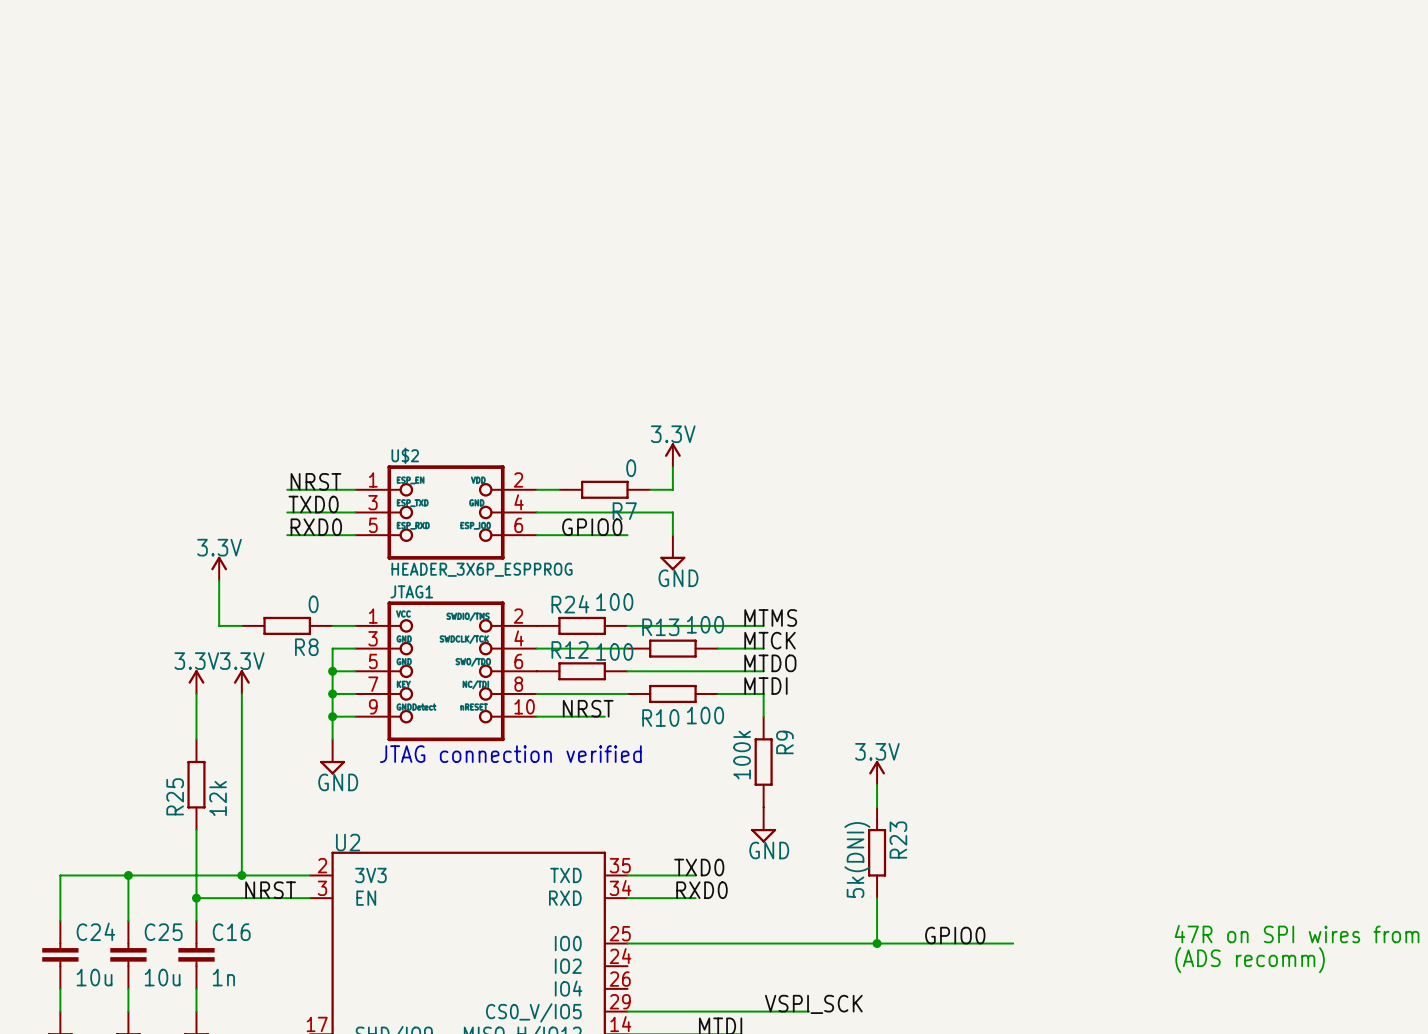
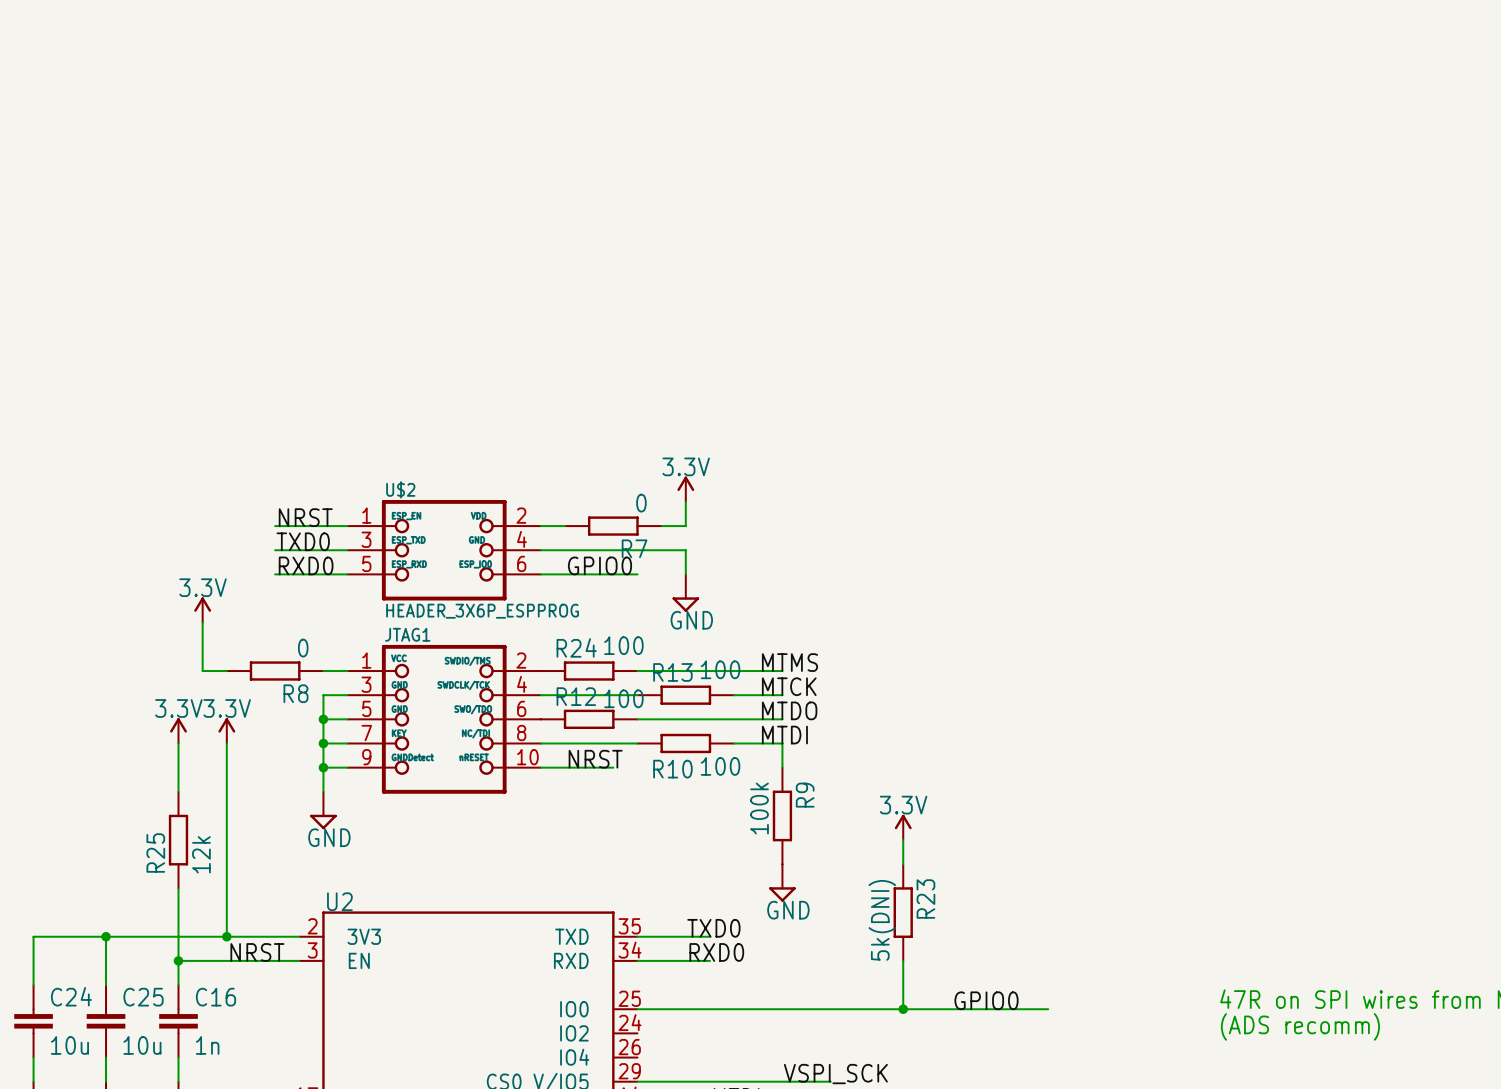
text: JTAG connection verified (510, 754) -> none

